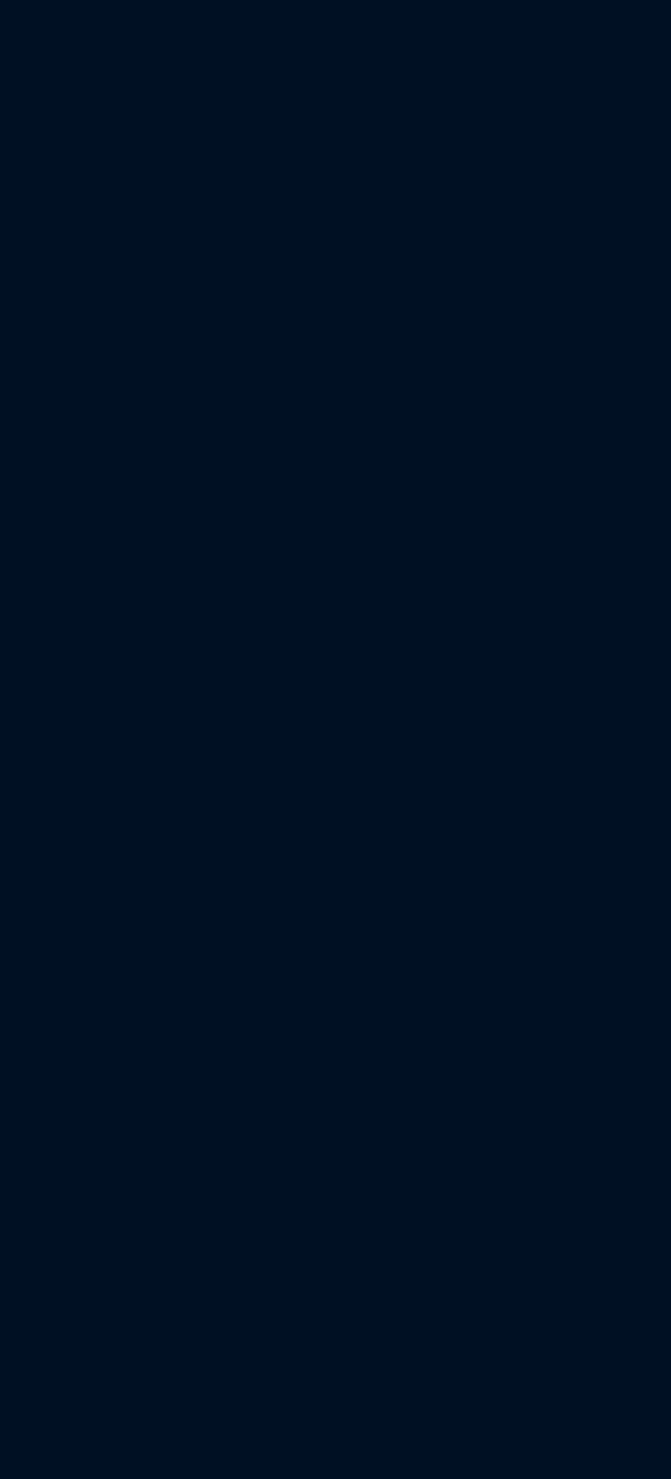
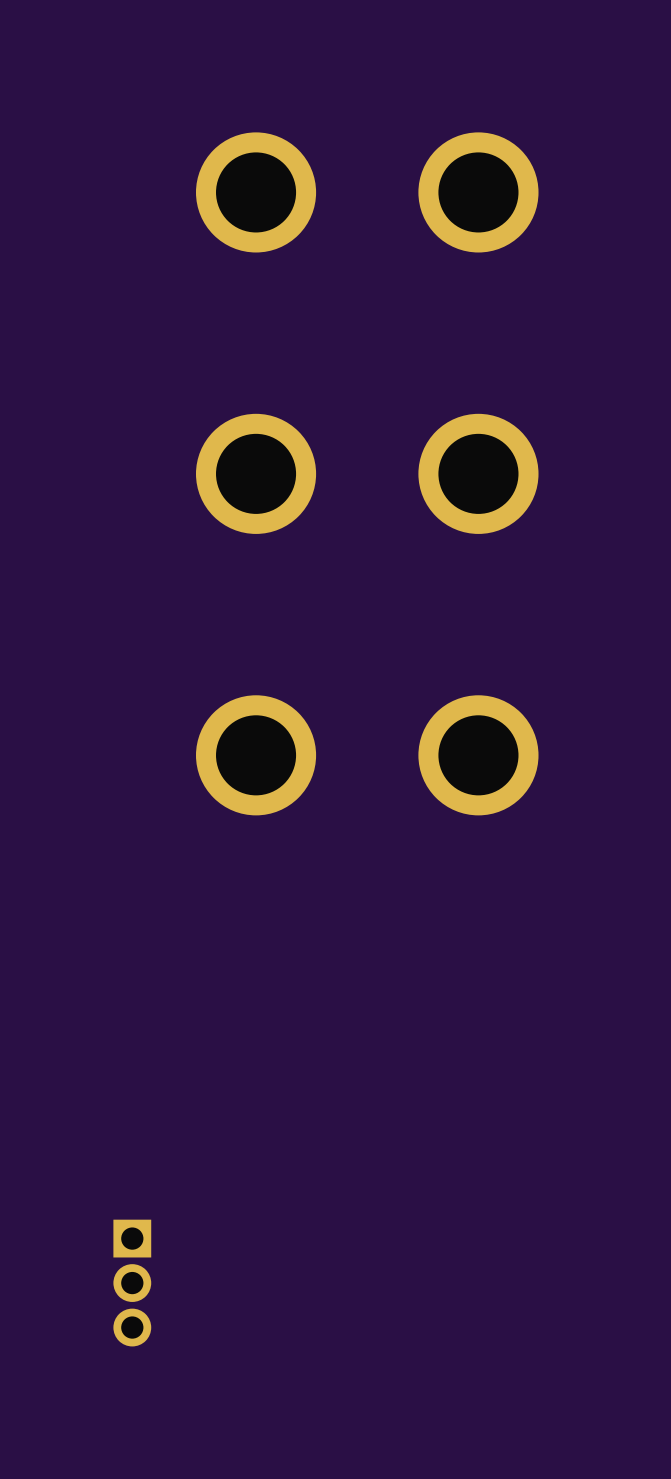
part: none -> (367, 192)
part: none -> (367, 473)
part: none -> (367, 755)
part: none -> (132, 1283)

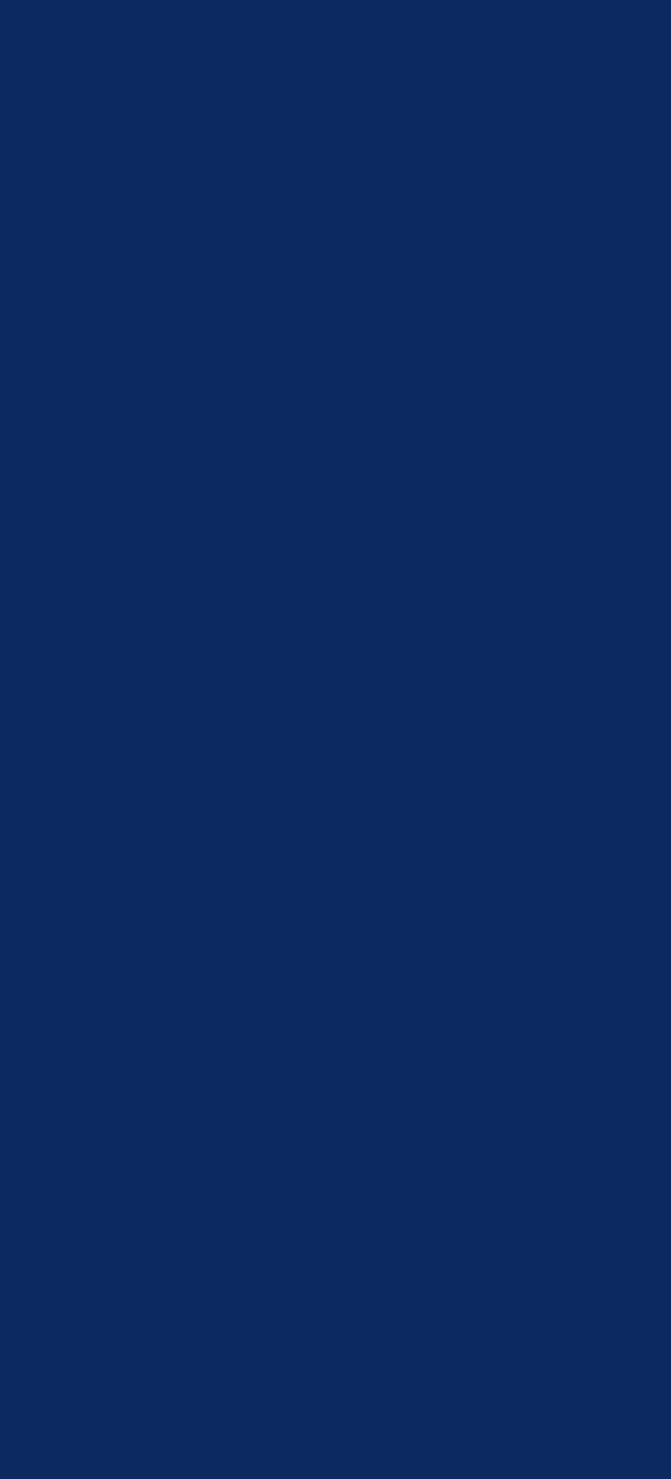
part: (367, 192) -> none
part: (367, 473) -> none
part: (367, 755) -> none
part: (132, 1283) -> none

